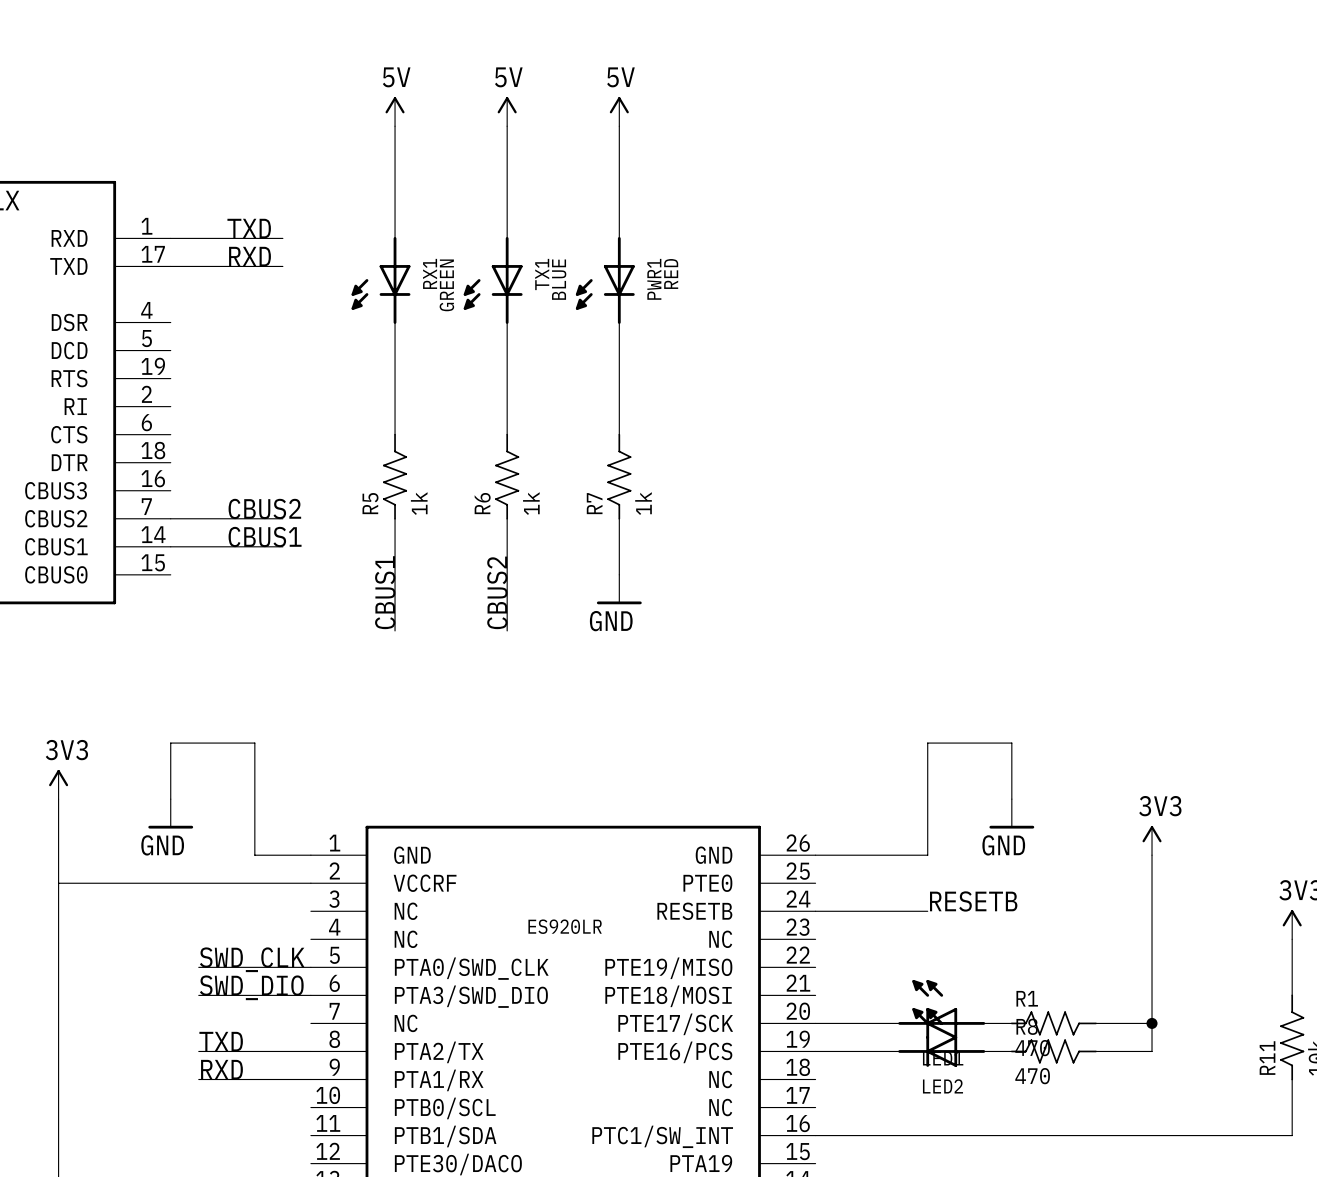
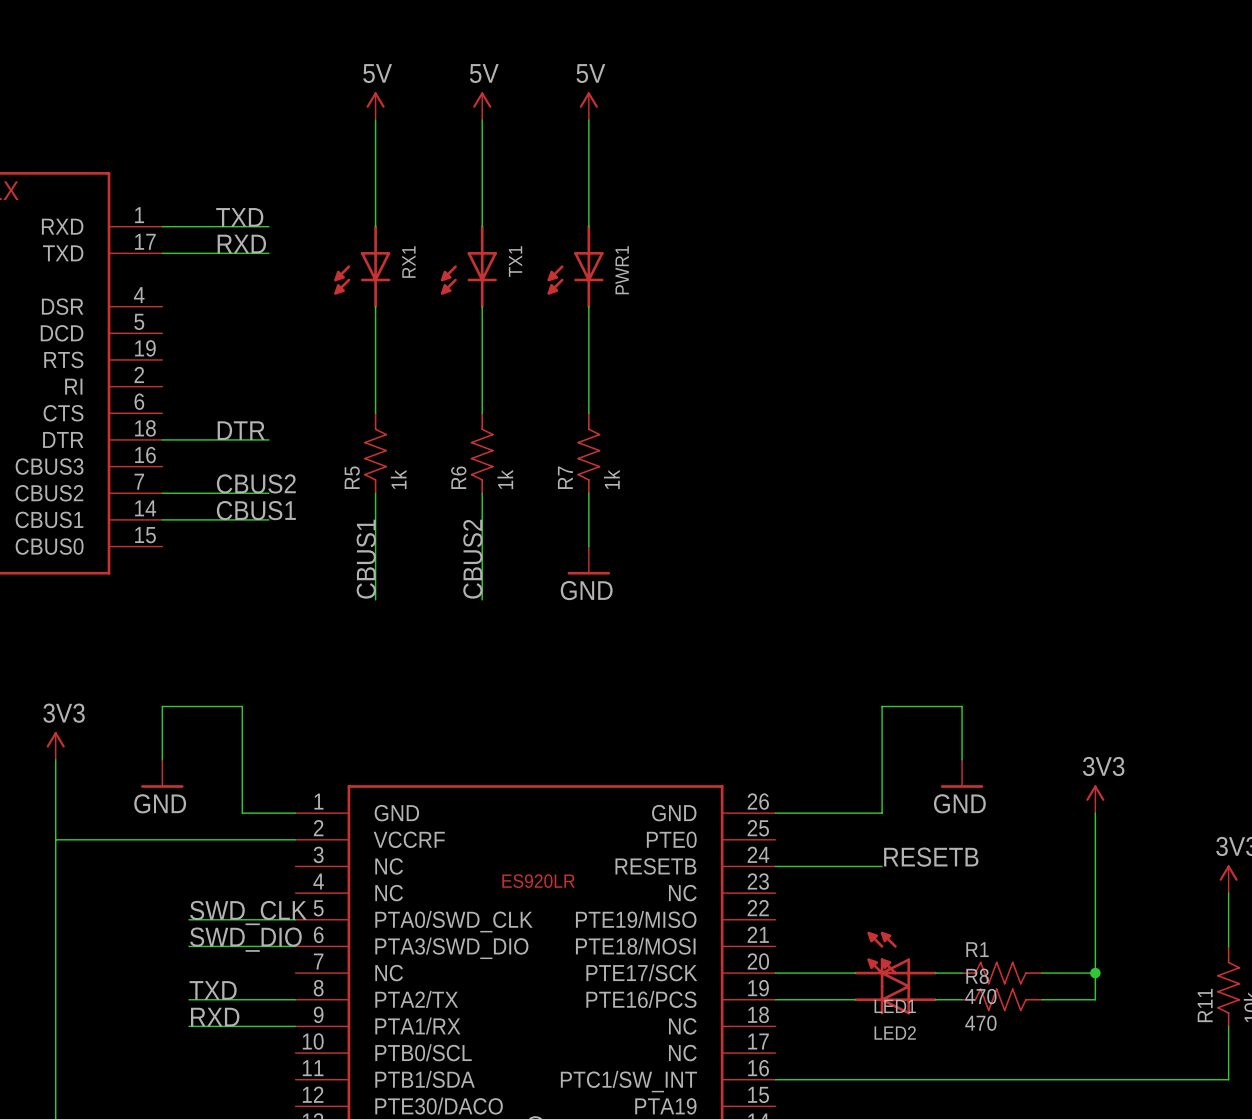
PWR1 value: RED (671, 273) -> none
TX1 value: BLUE (559, 279) -> none
RX1 value: GREEN (446, 285) -> none
label: none -> DTR (241, 430)
wire: none -> (162, 439) (268, 439)

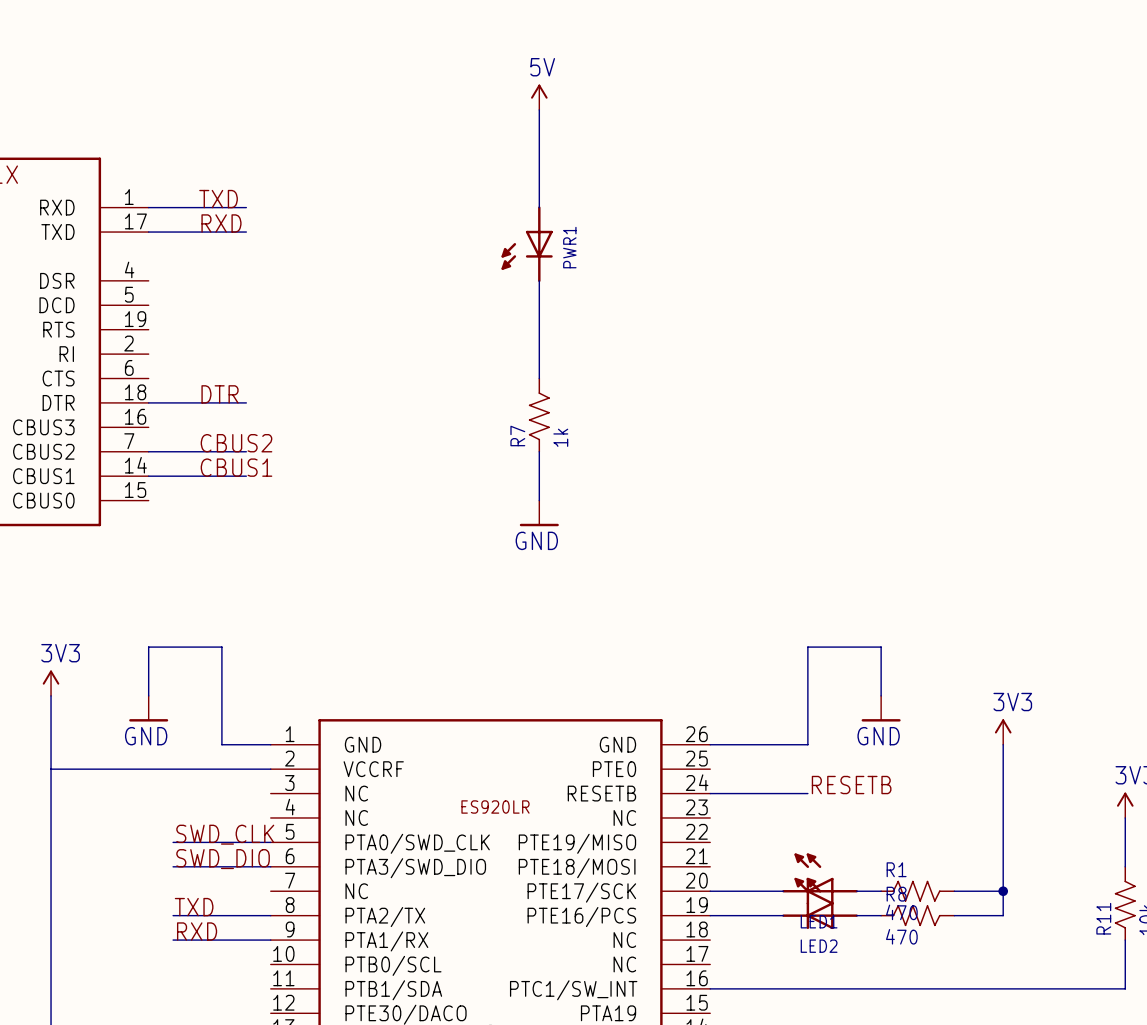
power symbol: 5V (375, 106) -> none
power symbol: 5V (482, 106) -> none
wire: (375, 120) (375, 226) -> none
wire: (482, 120) (482, 226) -> none
RX1: (362, 266) -> none
TX1: (468, 266) -> none
wire: (375, 306) (375, 413) -> none
wire: (482, 306) (482, 413) -> none
R5: 1k (375, 453) -> none
R6: 1k (482, 453) -> none
wire: (375, 493) (375, 599) -> none
wire: (482, 493) (482, 599) -> none
label: CBUS1 (366, 559) -> none
label: CBUS2 (472, 559) -> none

